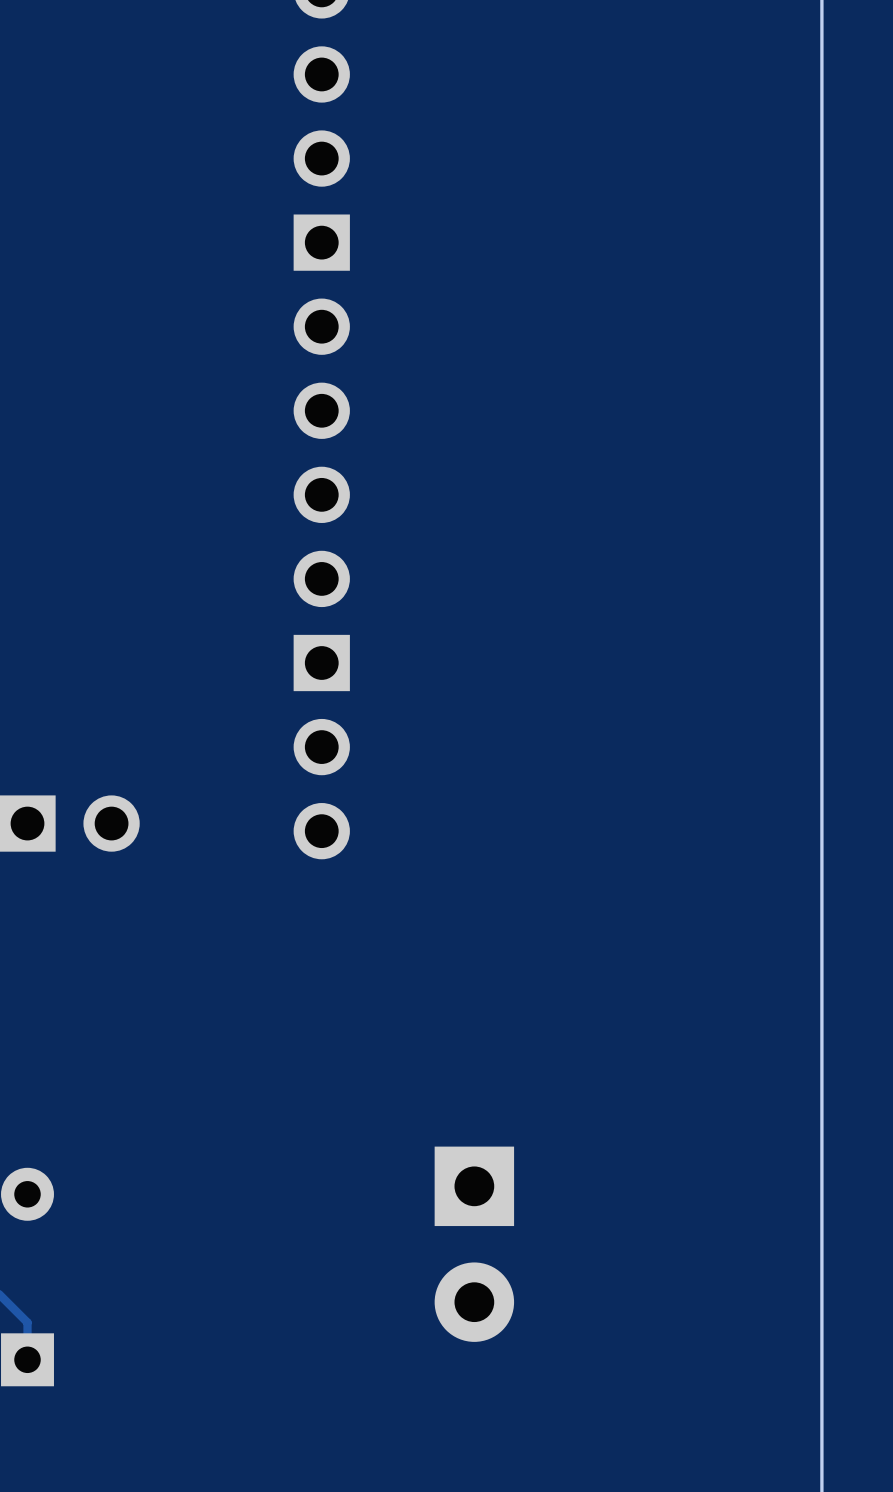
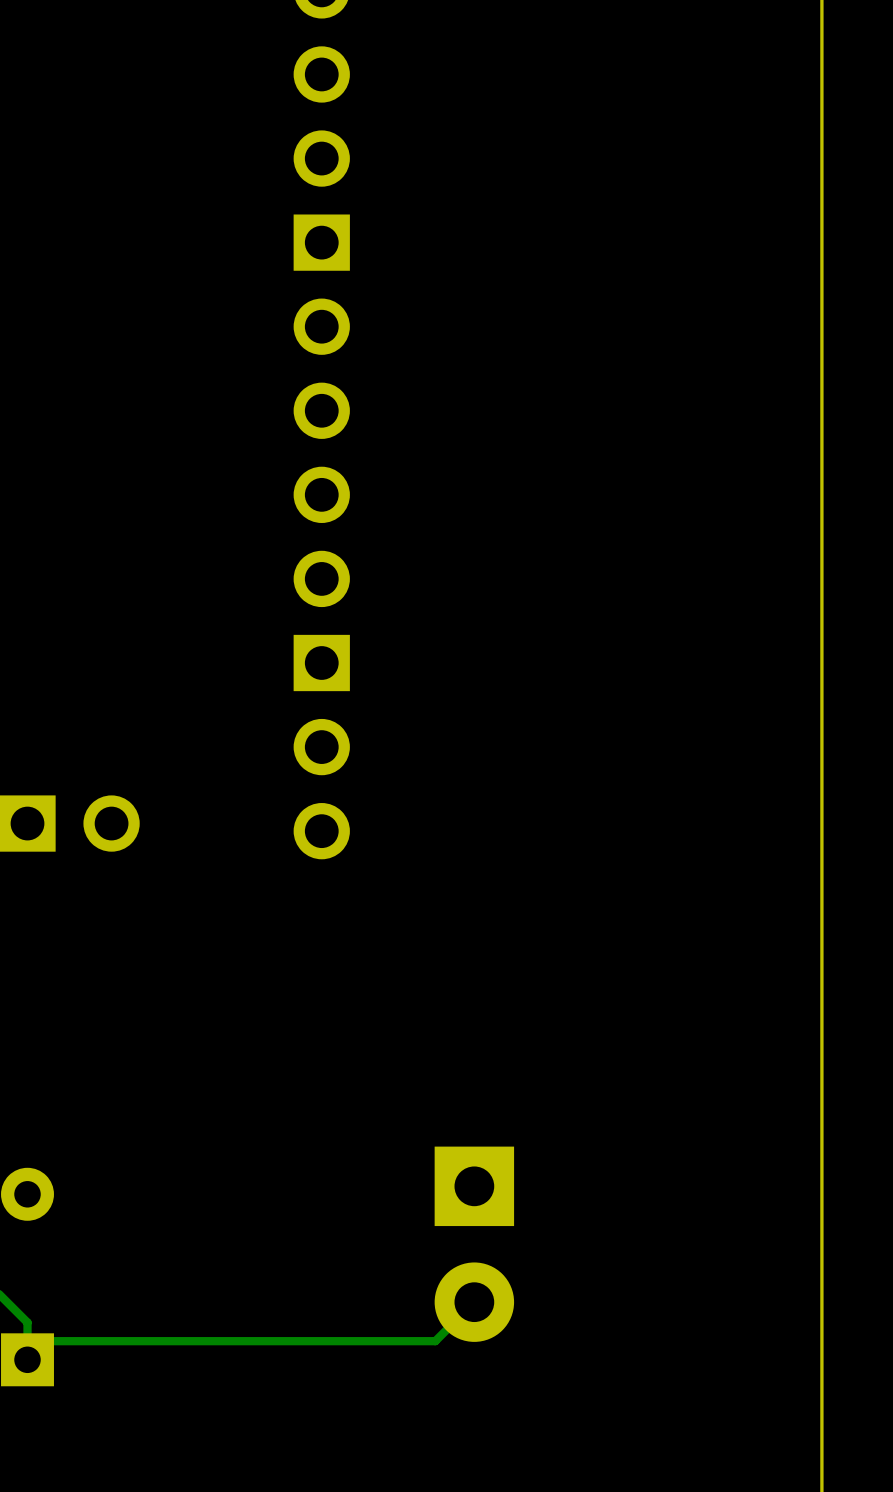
track: none -> (474, 1302) (435, 1341) (27, 1341)

